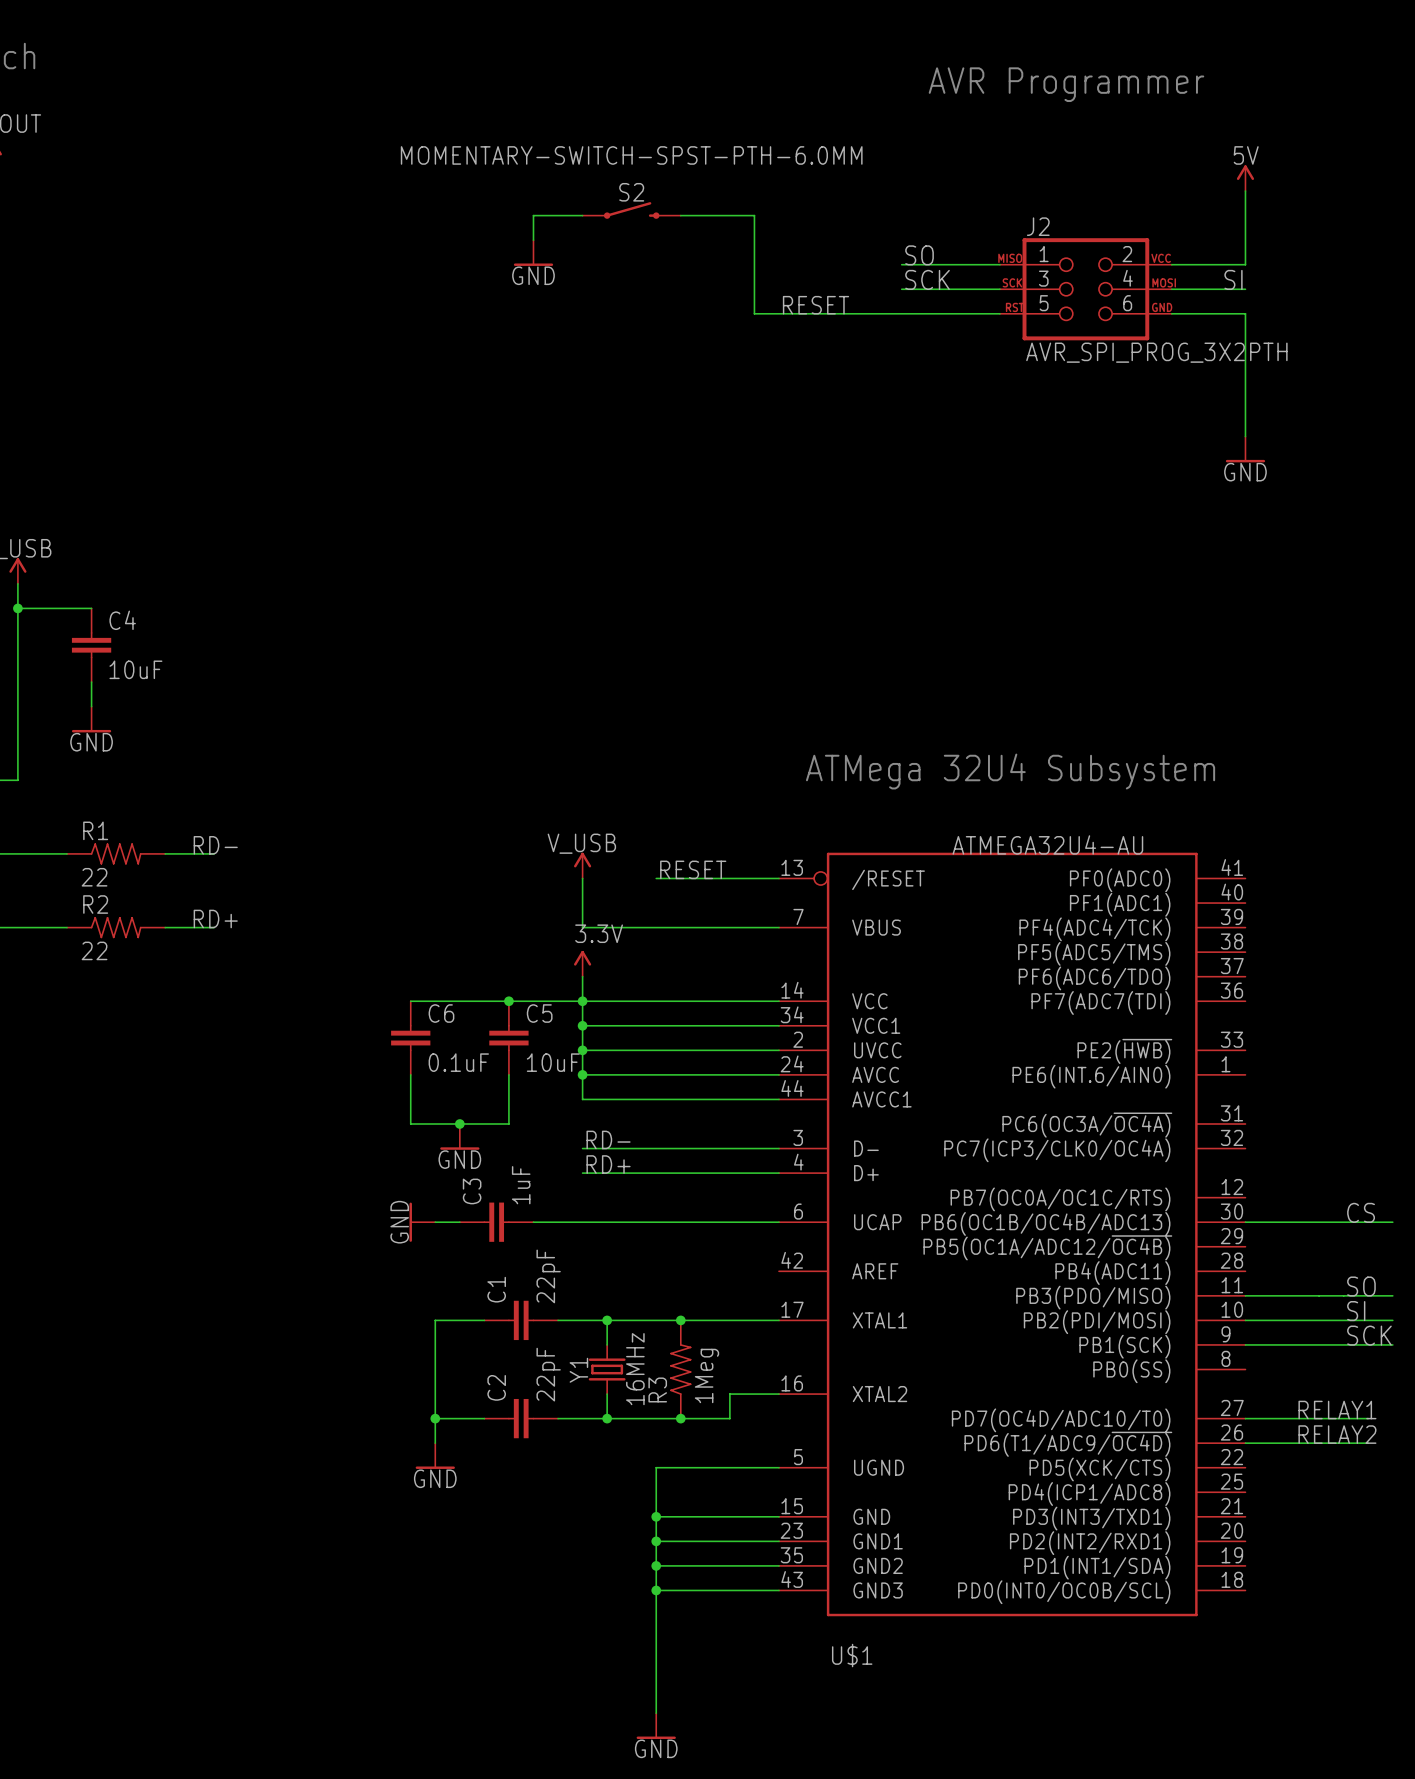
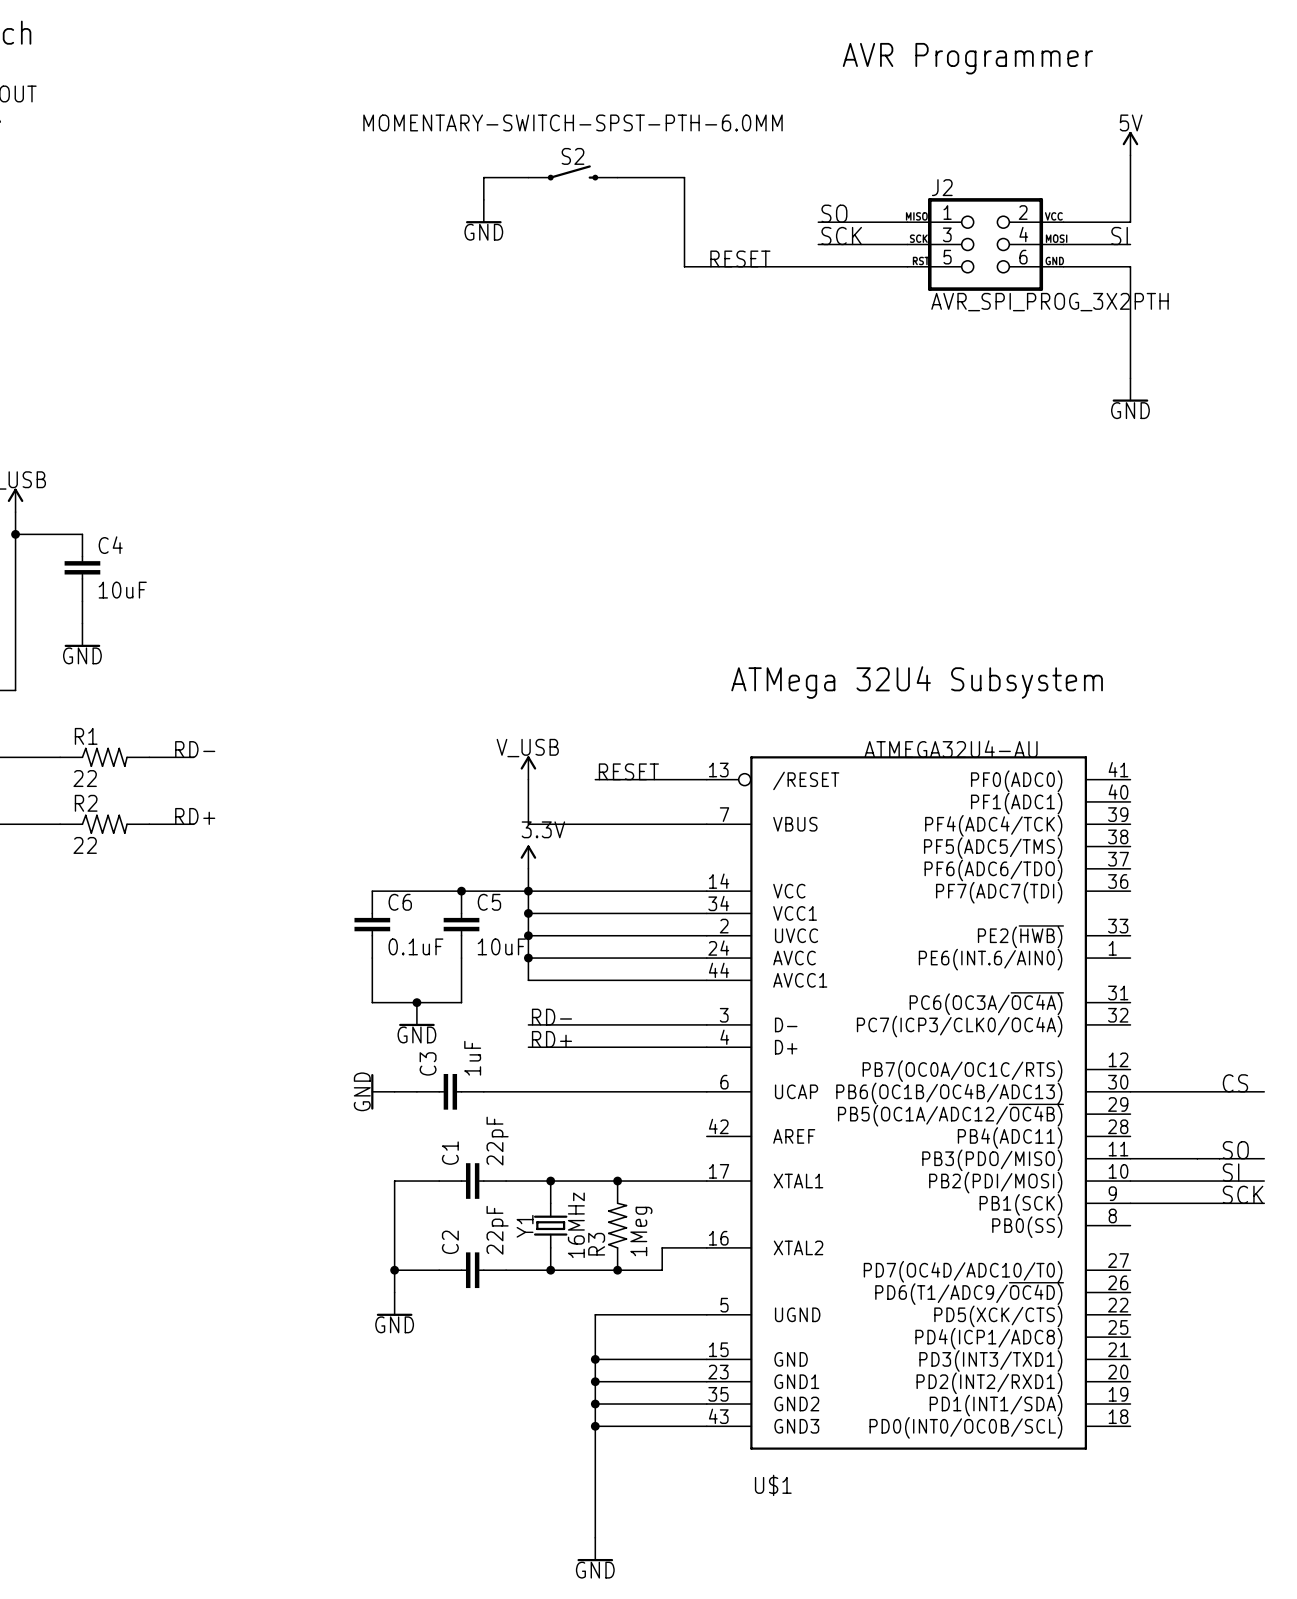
label: RELAY1 (1337, 1410) -> none
wire: (1245, 1418) (1368, 1418) -> none
label: RELAY2 (1337, 1434) -> none
wire: (1245, 1443) (1368, 1443) -> none

